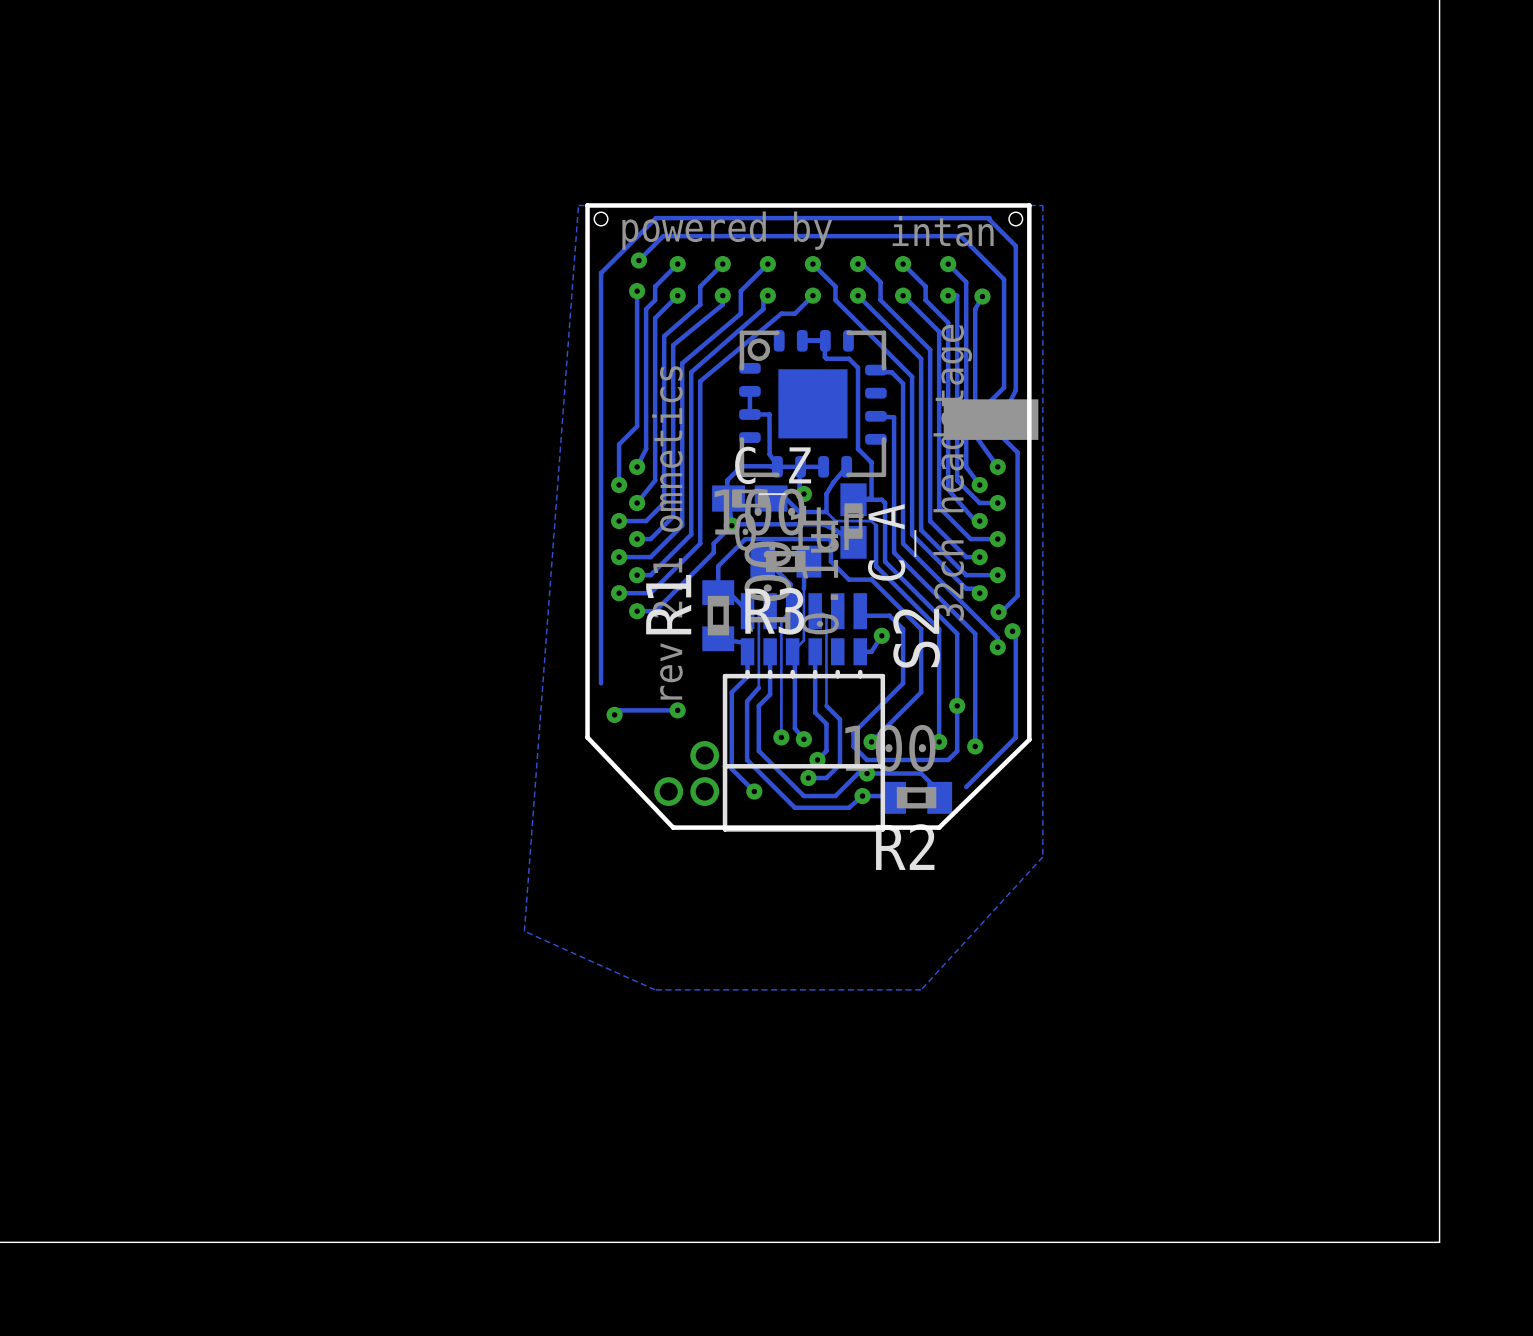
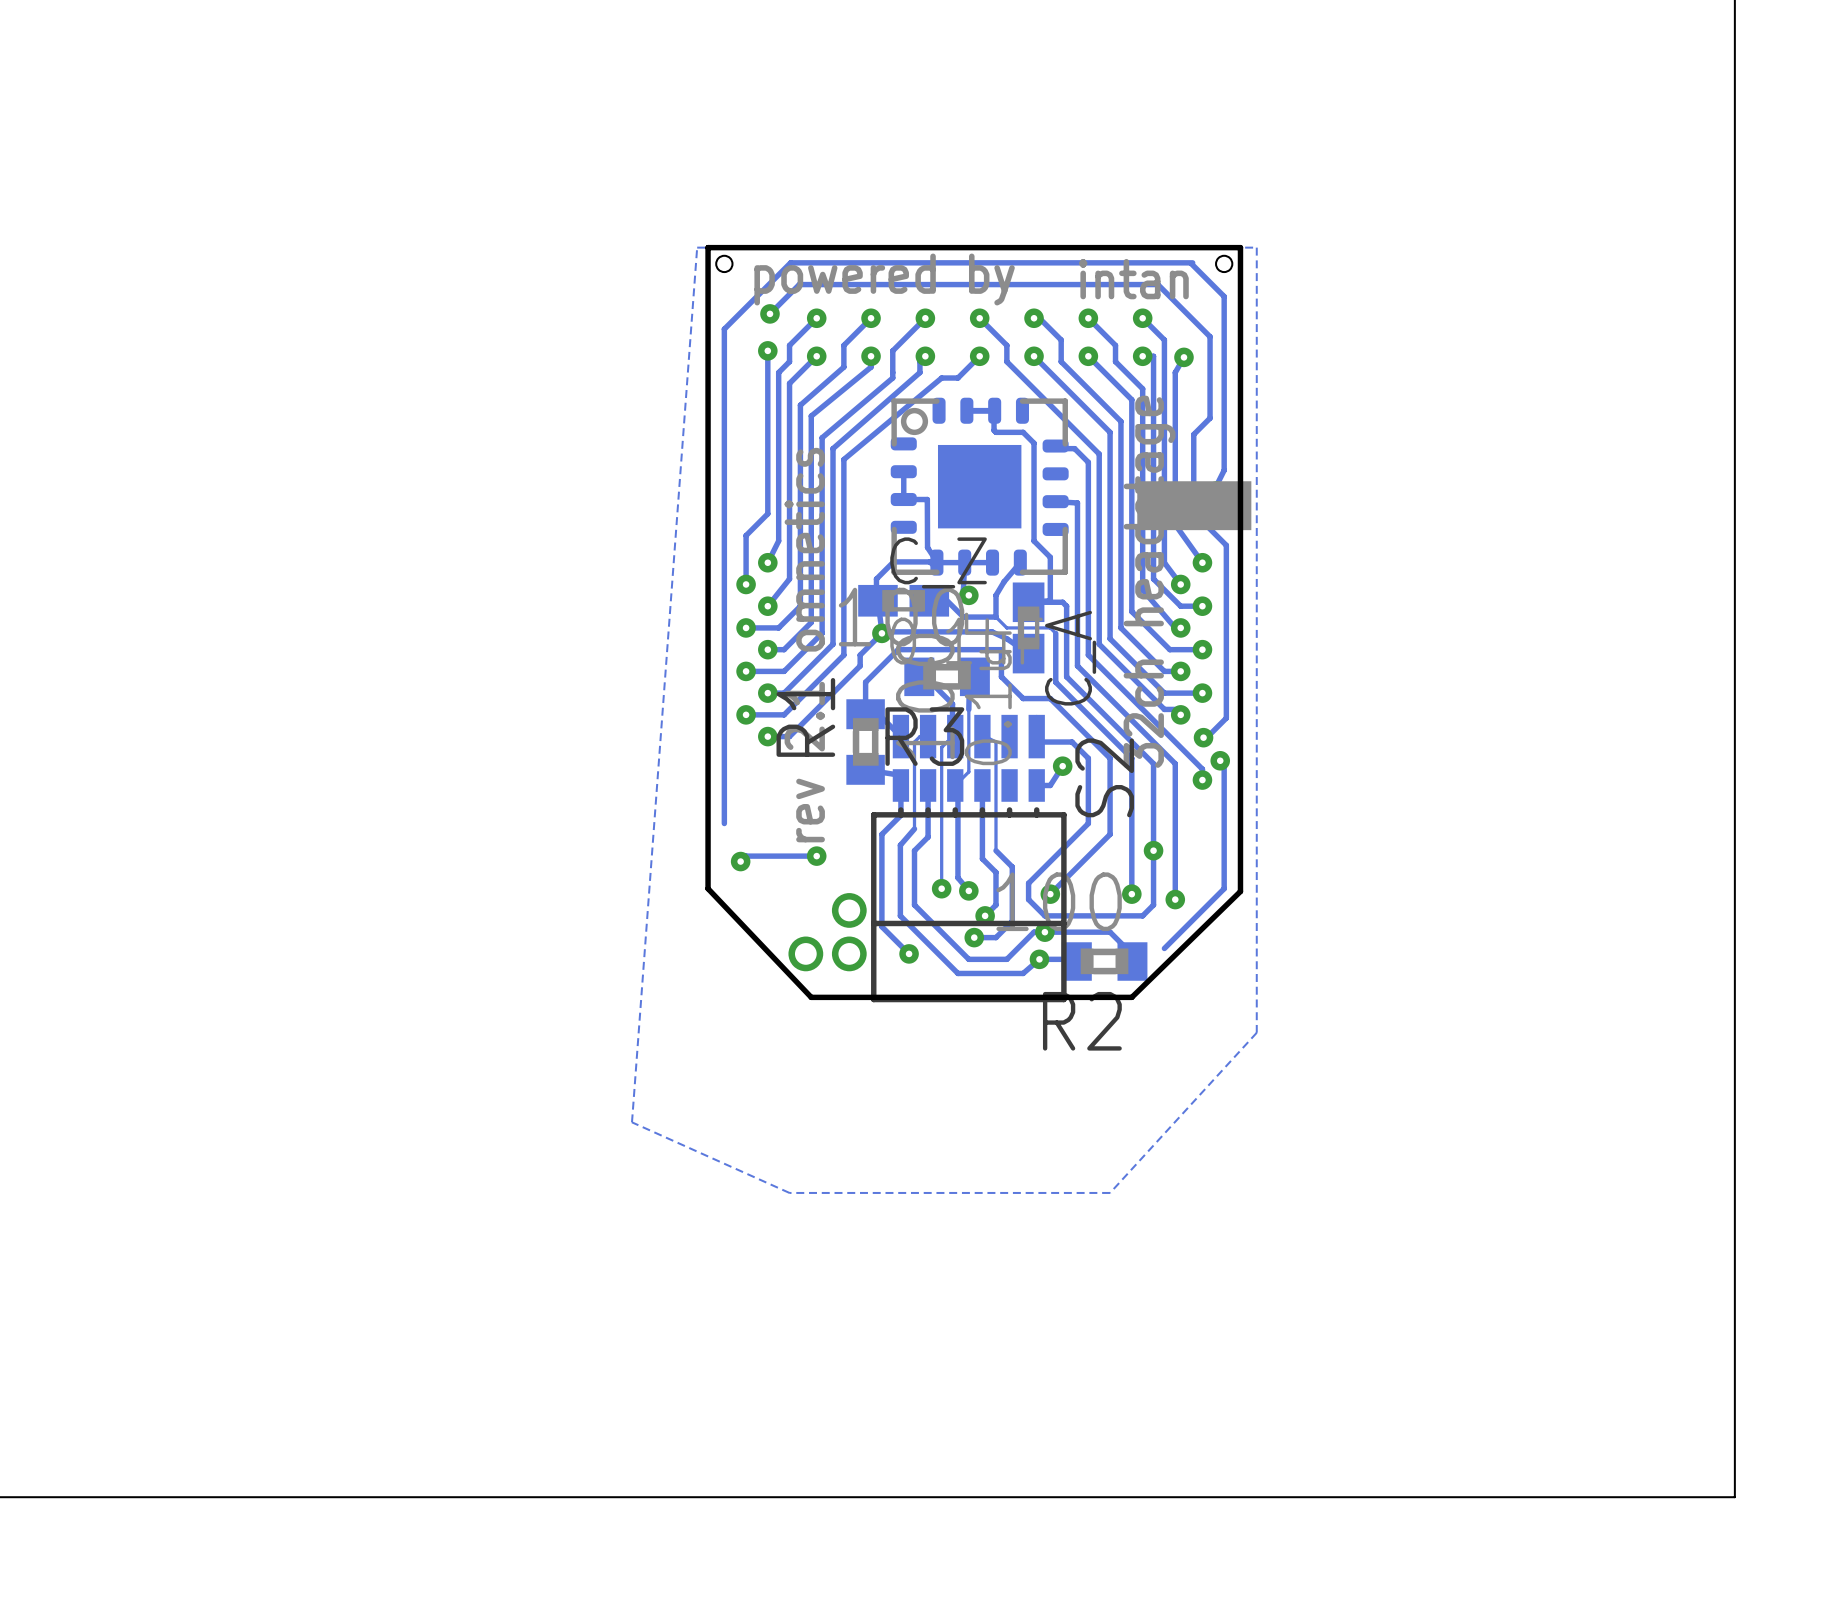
track: (1004, 347) (1004, 387) (990, 401) -> (1210, 418) (1193, 434) (1193, 483)

